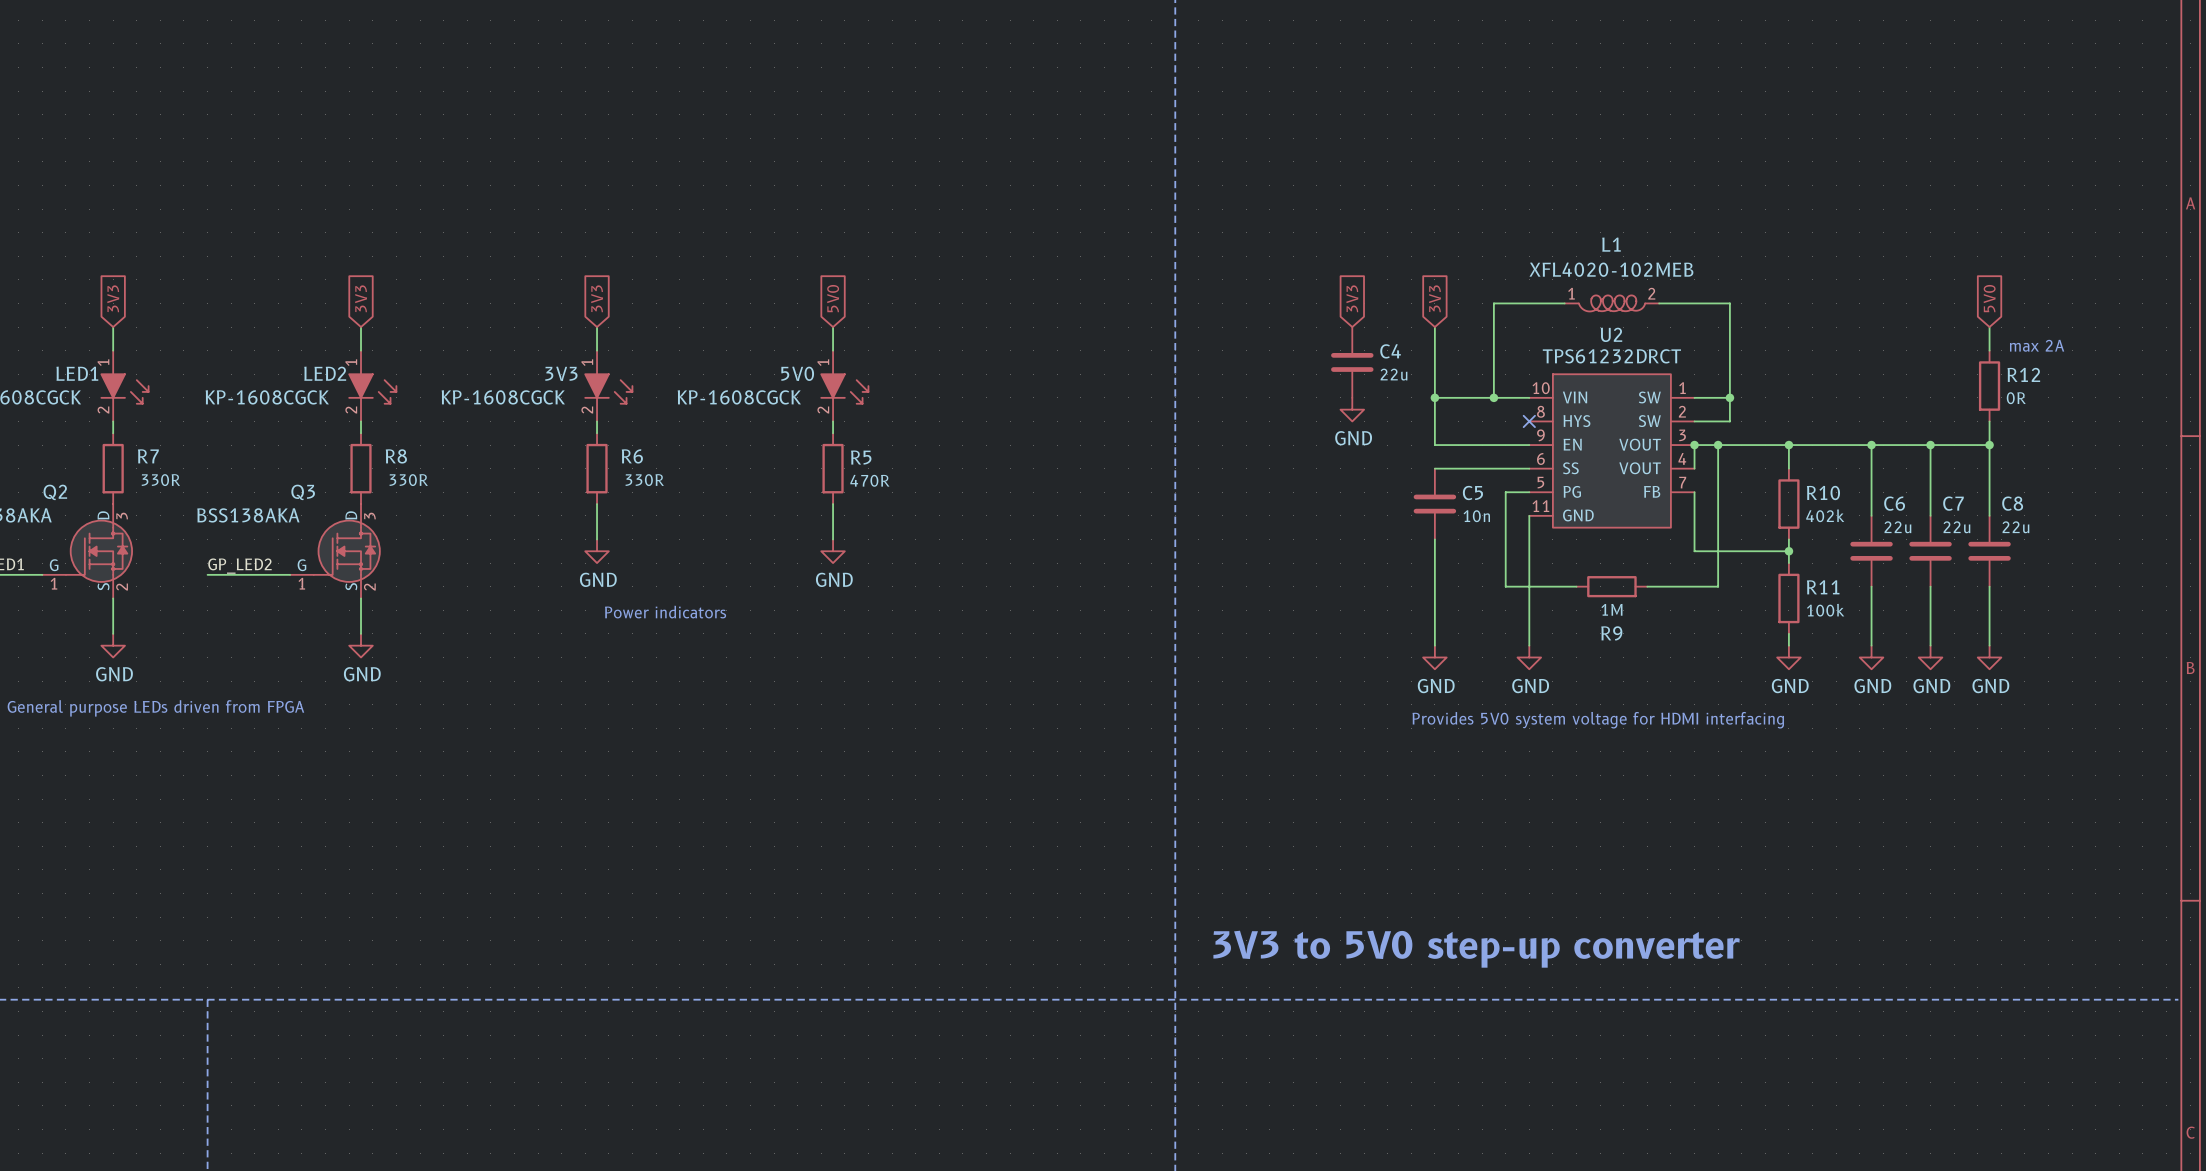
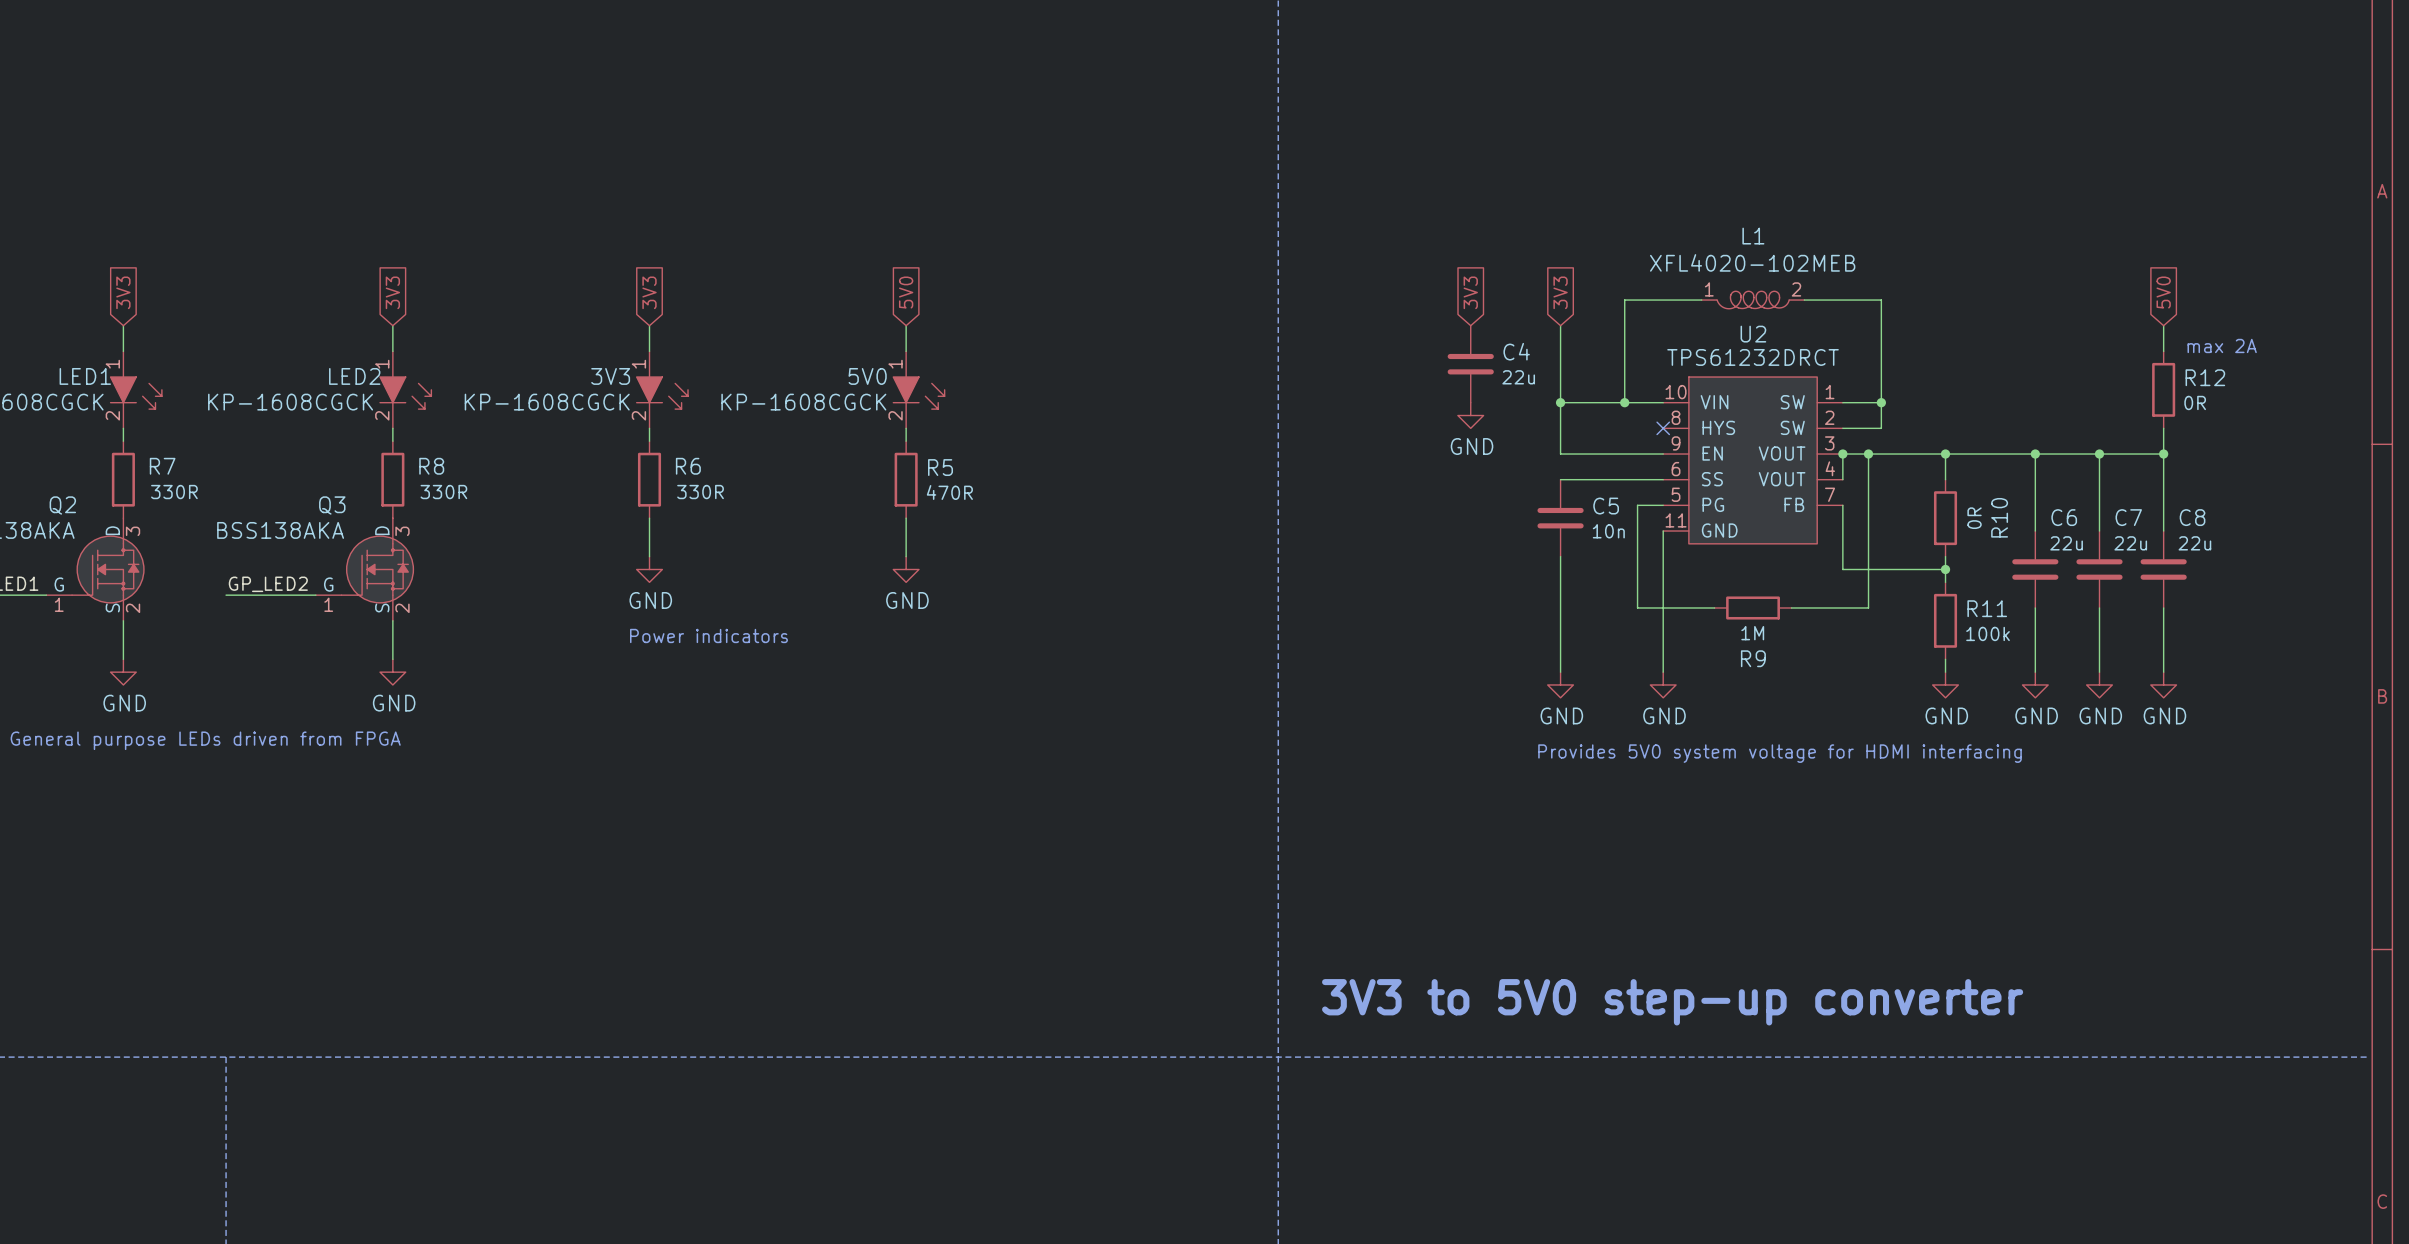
R10 name rotation: 0° (1823, 492) -> 90° counterclockwise (1999, 517)
R10 text: 402k (1825, 515) -> 0R (1974, 518)

